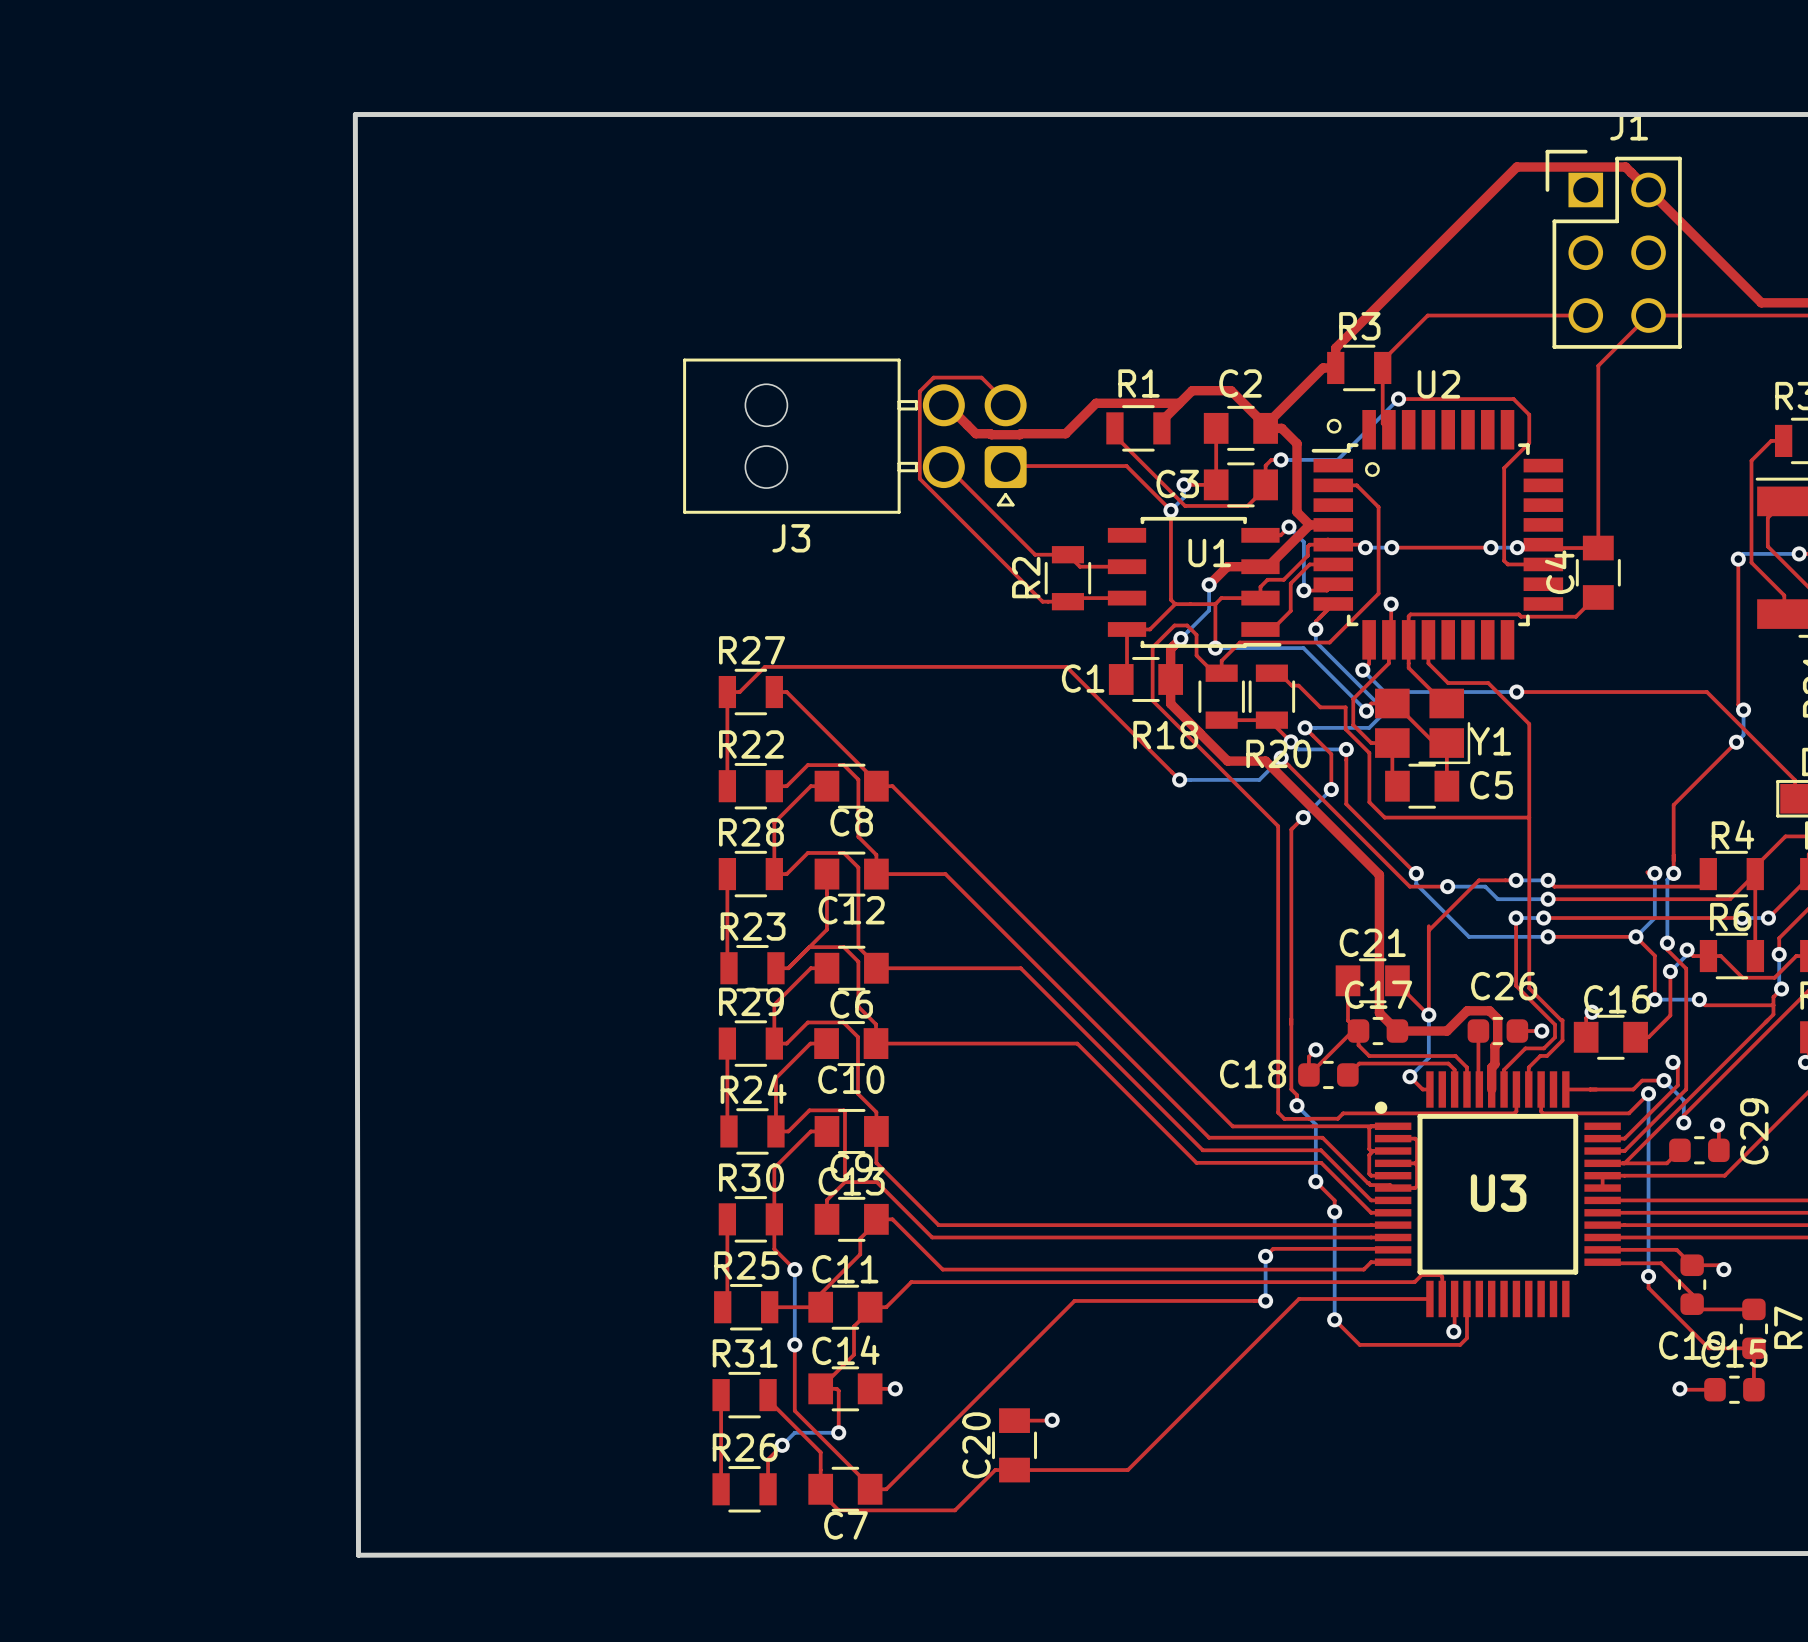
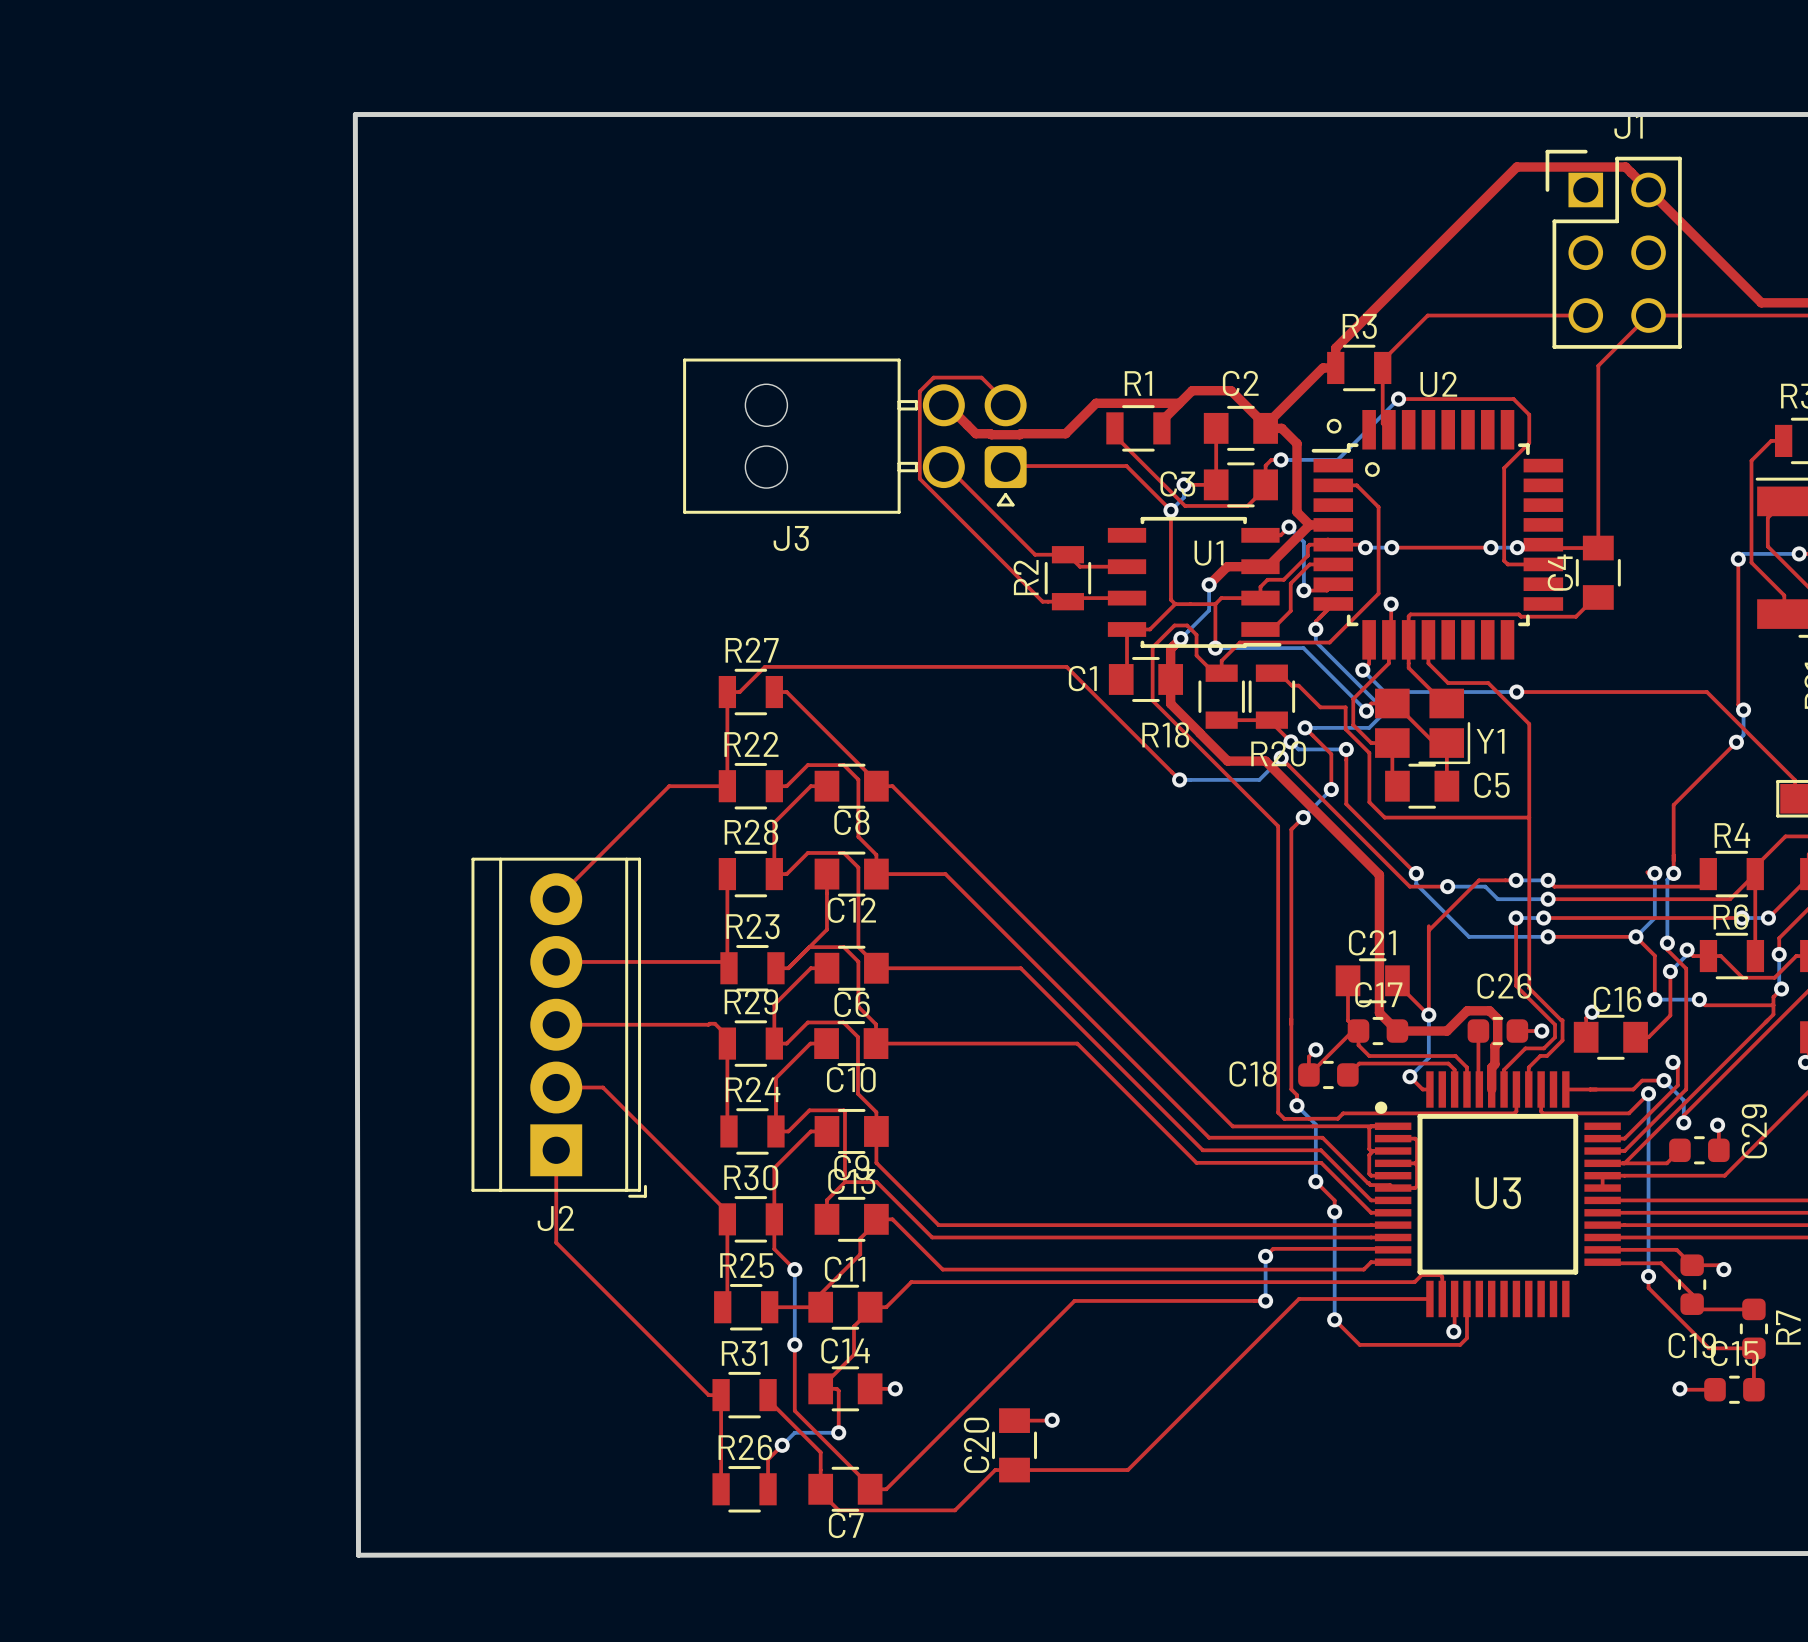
top track: none -> (727, 786) (669, 786) (556, 899)
top track: none -> (556, 961) (722, 961) (727, 966)
top track: none -> (556, 1024) (714, 1023) (727, 1036) (727, 1043)
J2: none -> (559, 1027)
top track: none -> (556, 1087) (602, 1087) (727, 1211) (727, 1219)
top track: none -> (556, 1150) (556, 1242) (708, 1395) (721, 1395)

